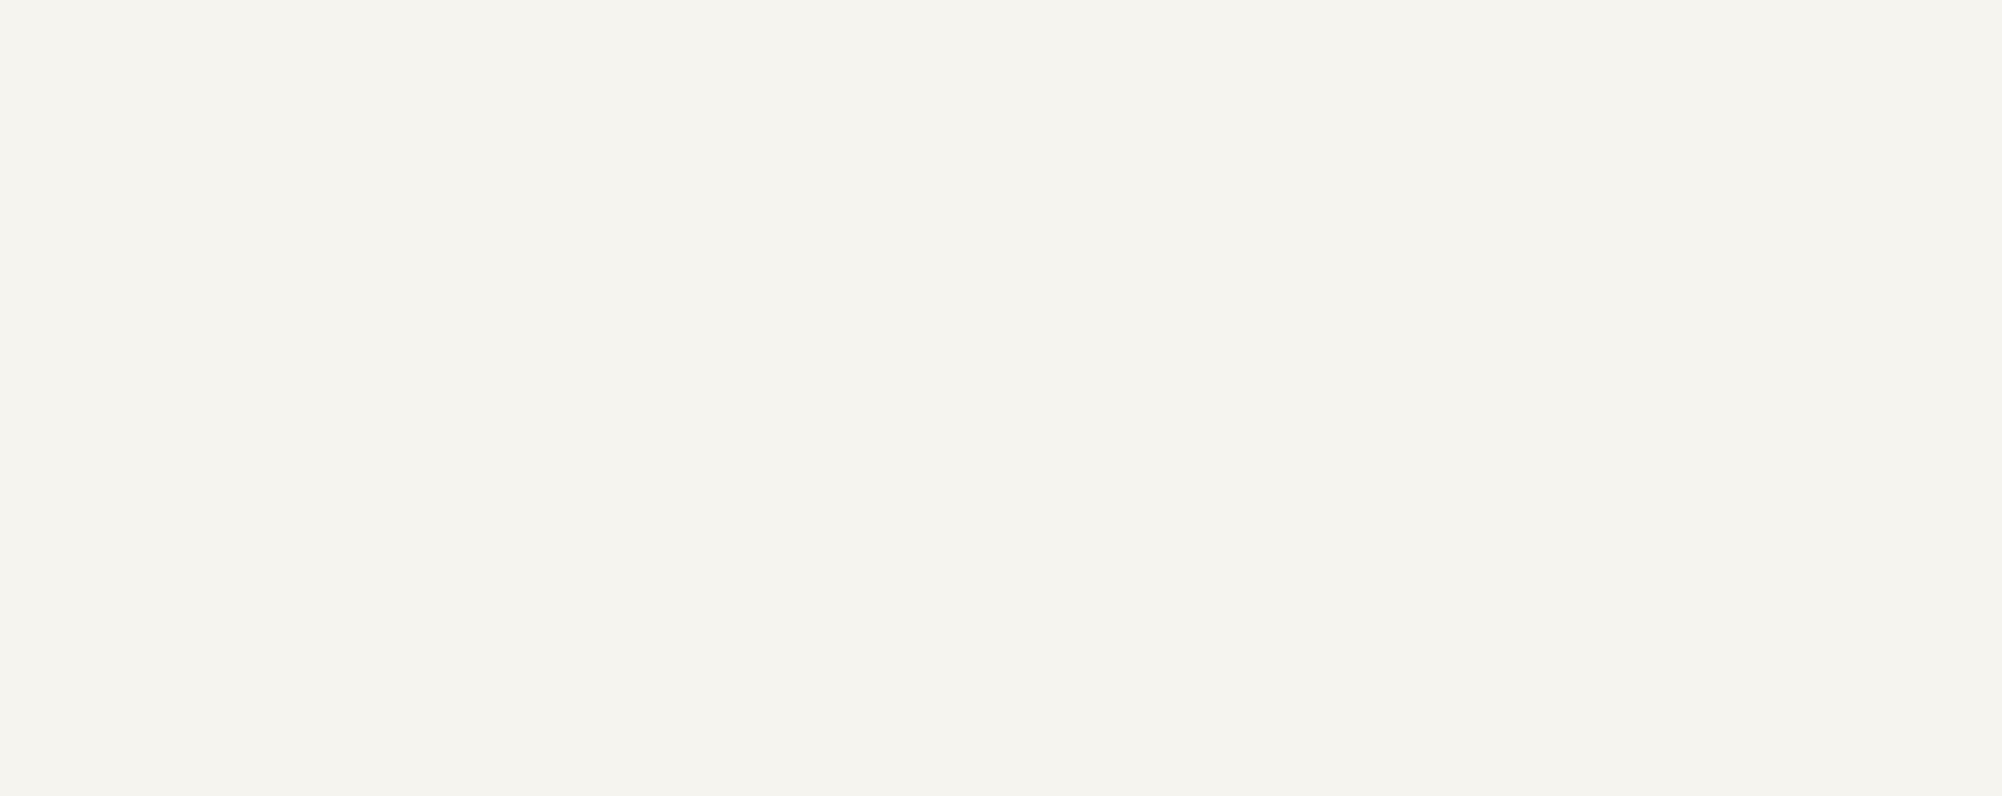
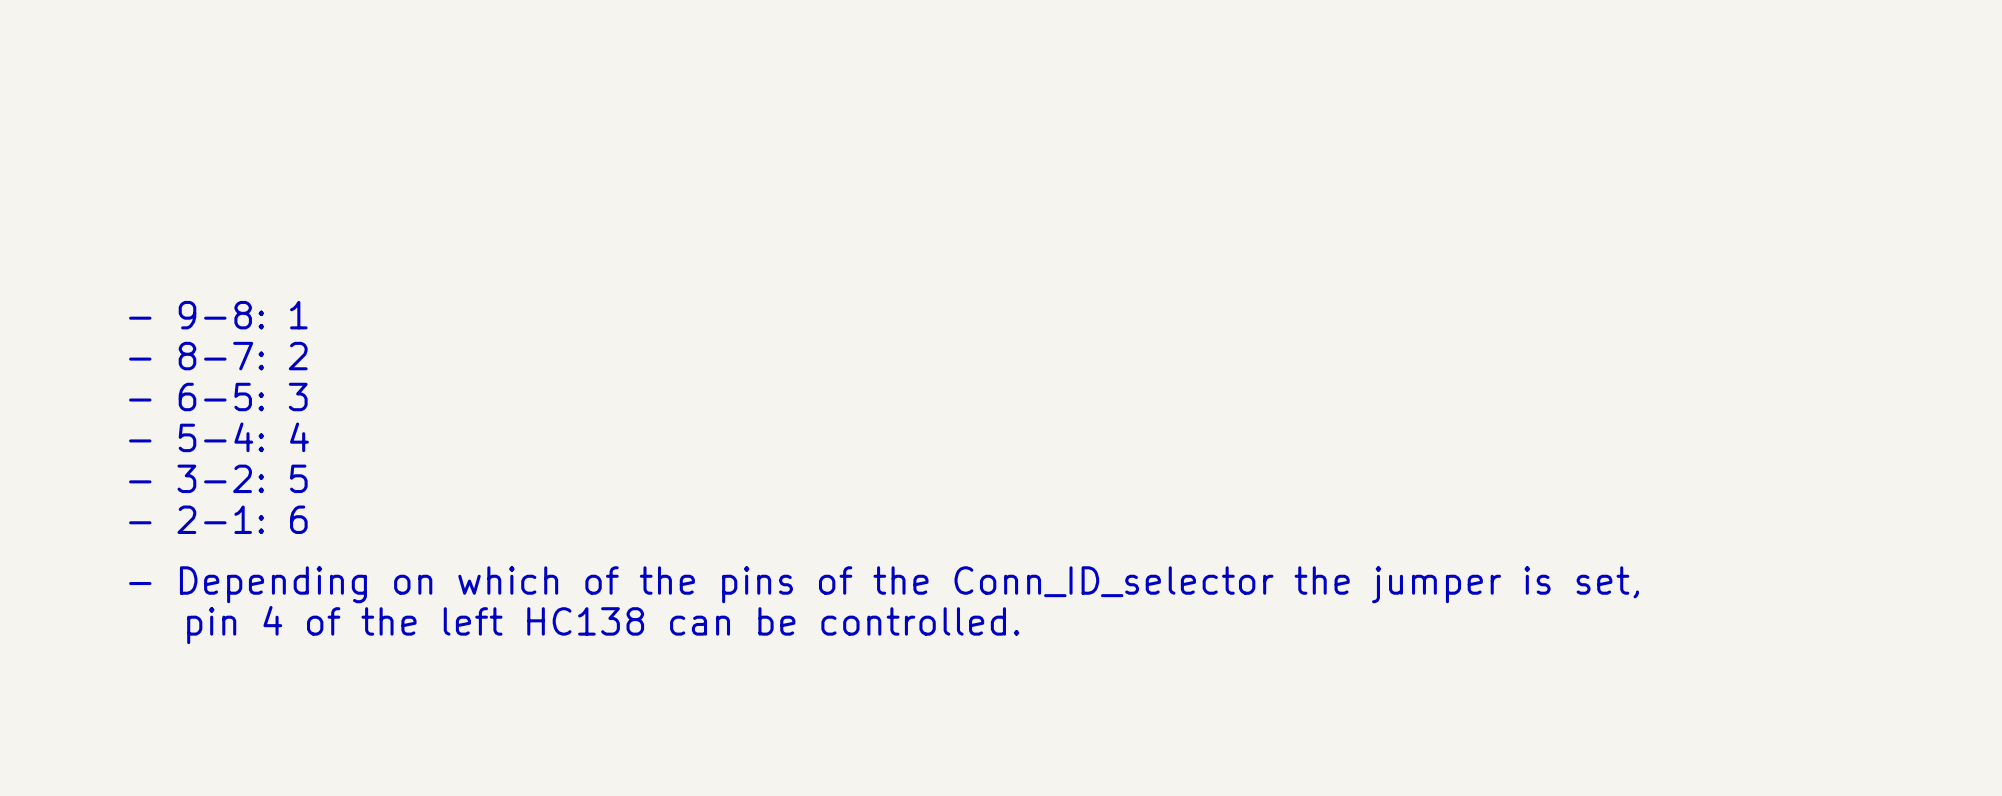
text: none -> - 9-8: 1 (218, 315)
text: none -> - 8-7: 2 (218, 356)
text: none -> - 6-5: 3 (218, 396)
text: none -> - 5-4: 4 (218, 437)
text: none -> - 3-2: 5 (218, 478)
text: none -> - 2-1: 6 (218, 519)
text: none -> - Depending on which of the pins of the Conn_ID_selector the jumper is set, (884, 584)
text: none -> pin 4 of the left HC138 can be controlled. (603, 625)

